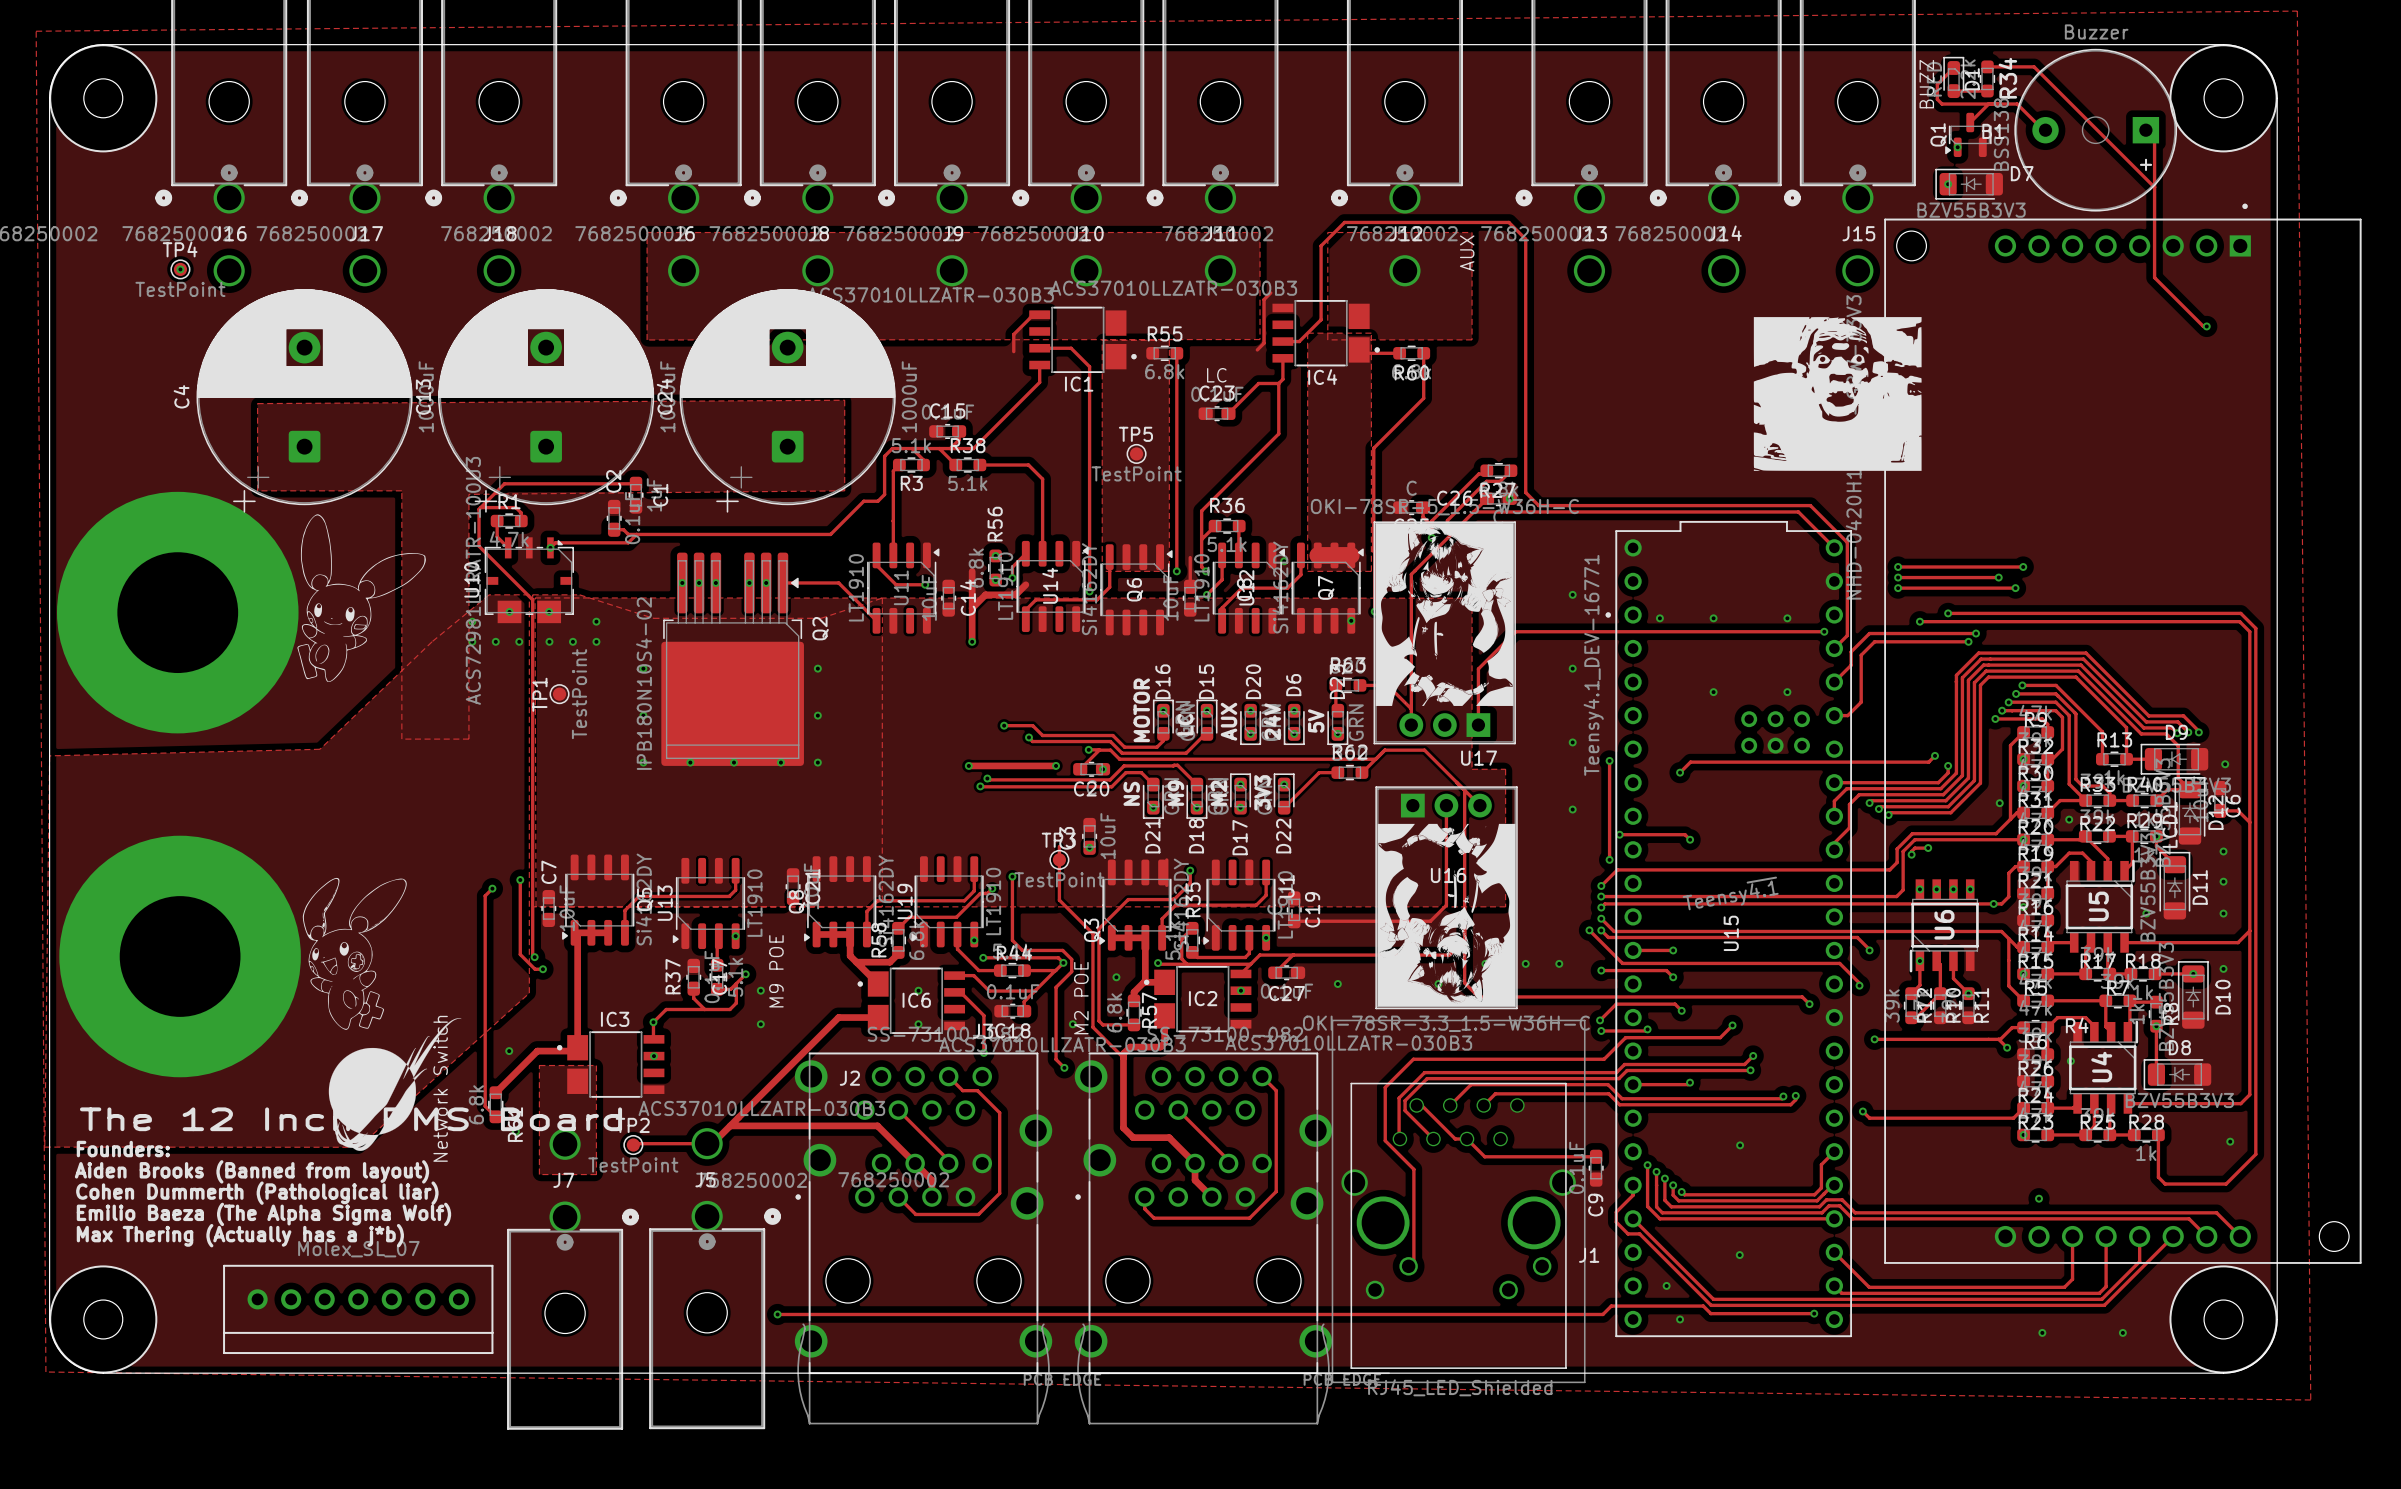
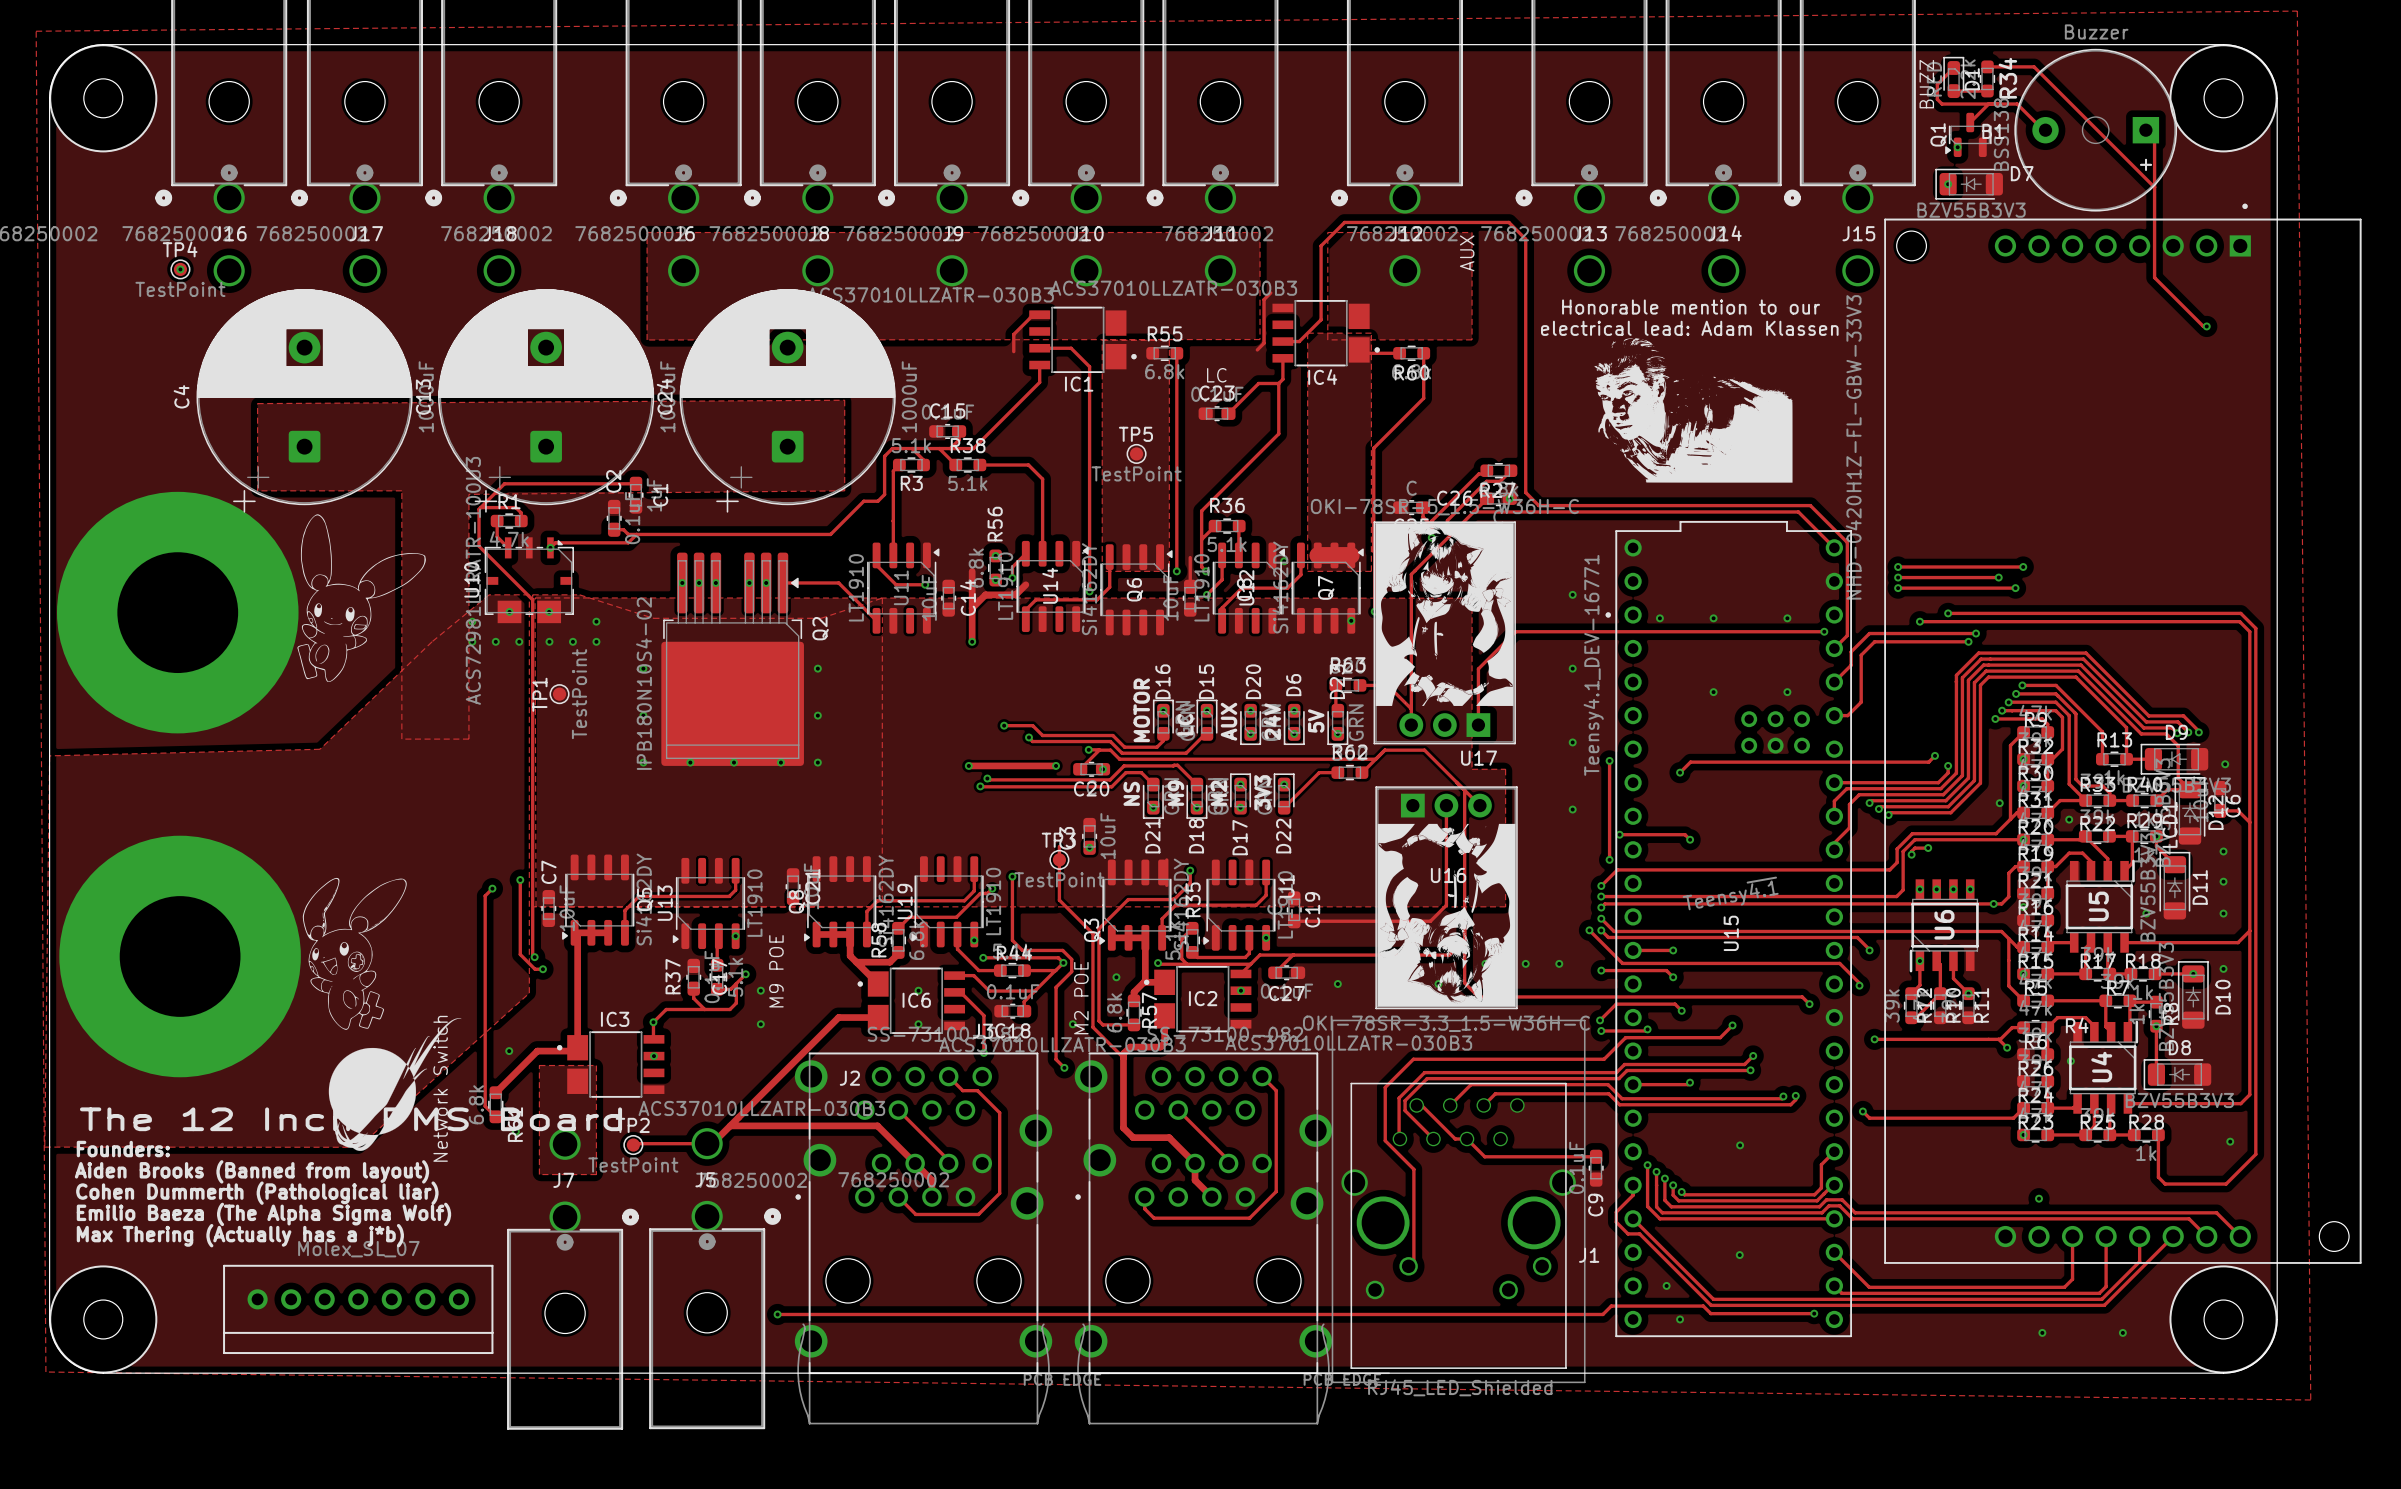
text: none -> Honorable mention to our (1691, 307)
text: none -> electrical lead: Adam Klassen (1689, 328)
drawing: none -> [1594, 338, 1793, 483]
part: (1837, 393) -> none

